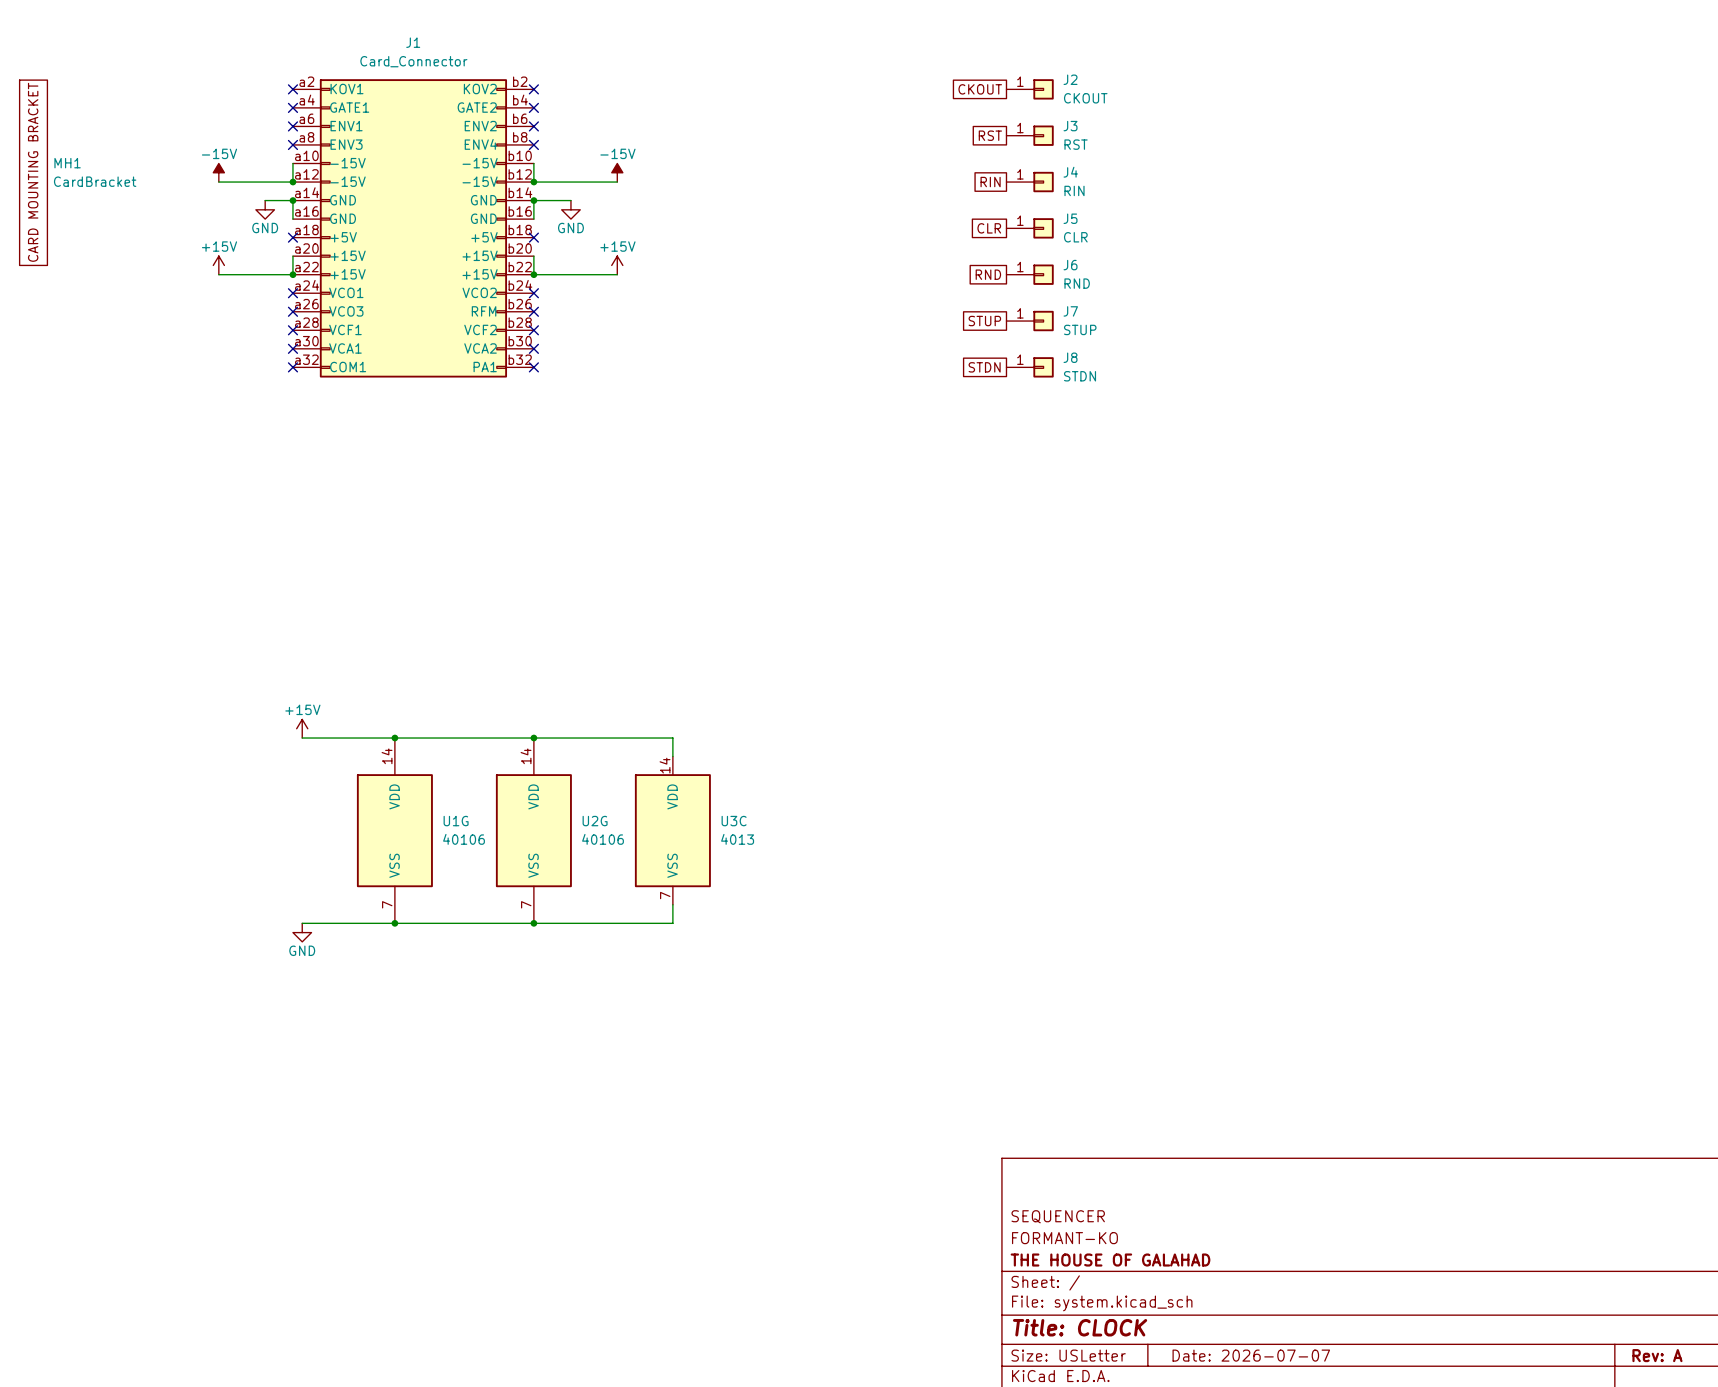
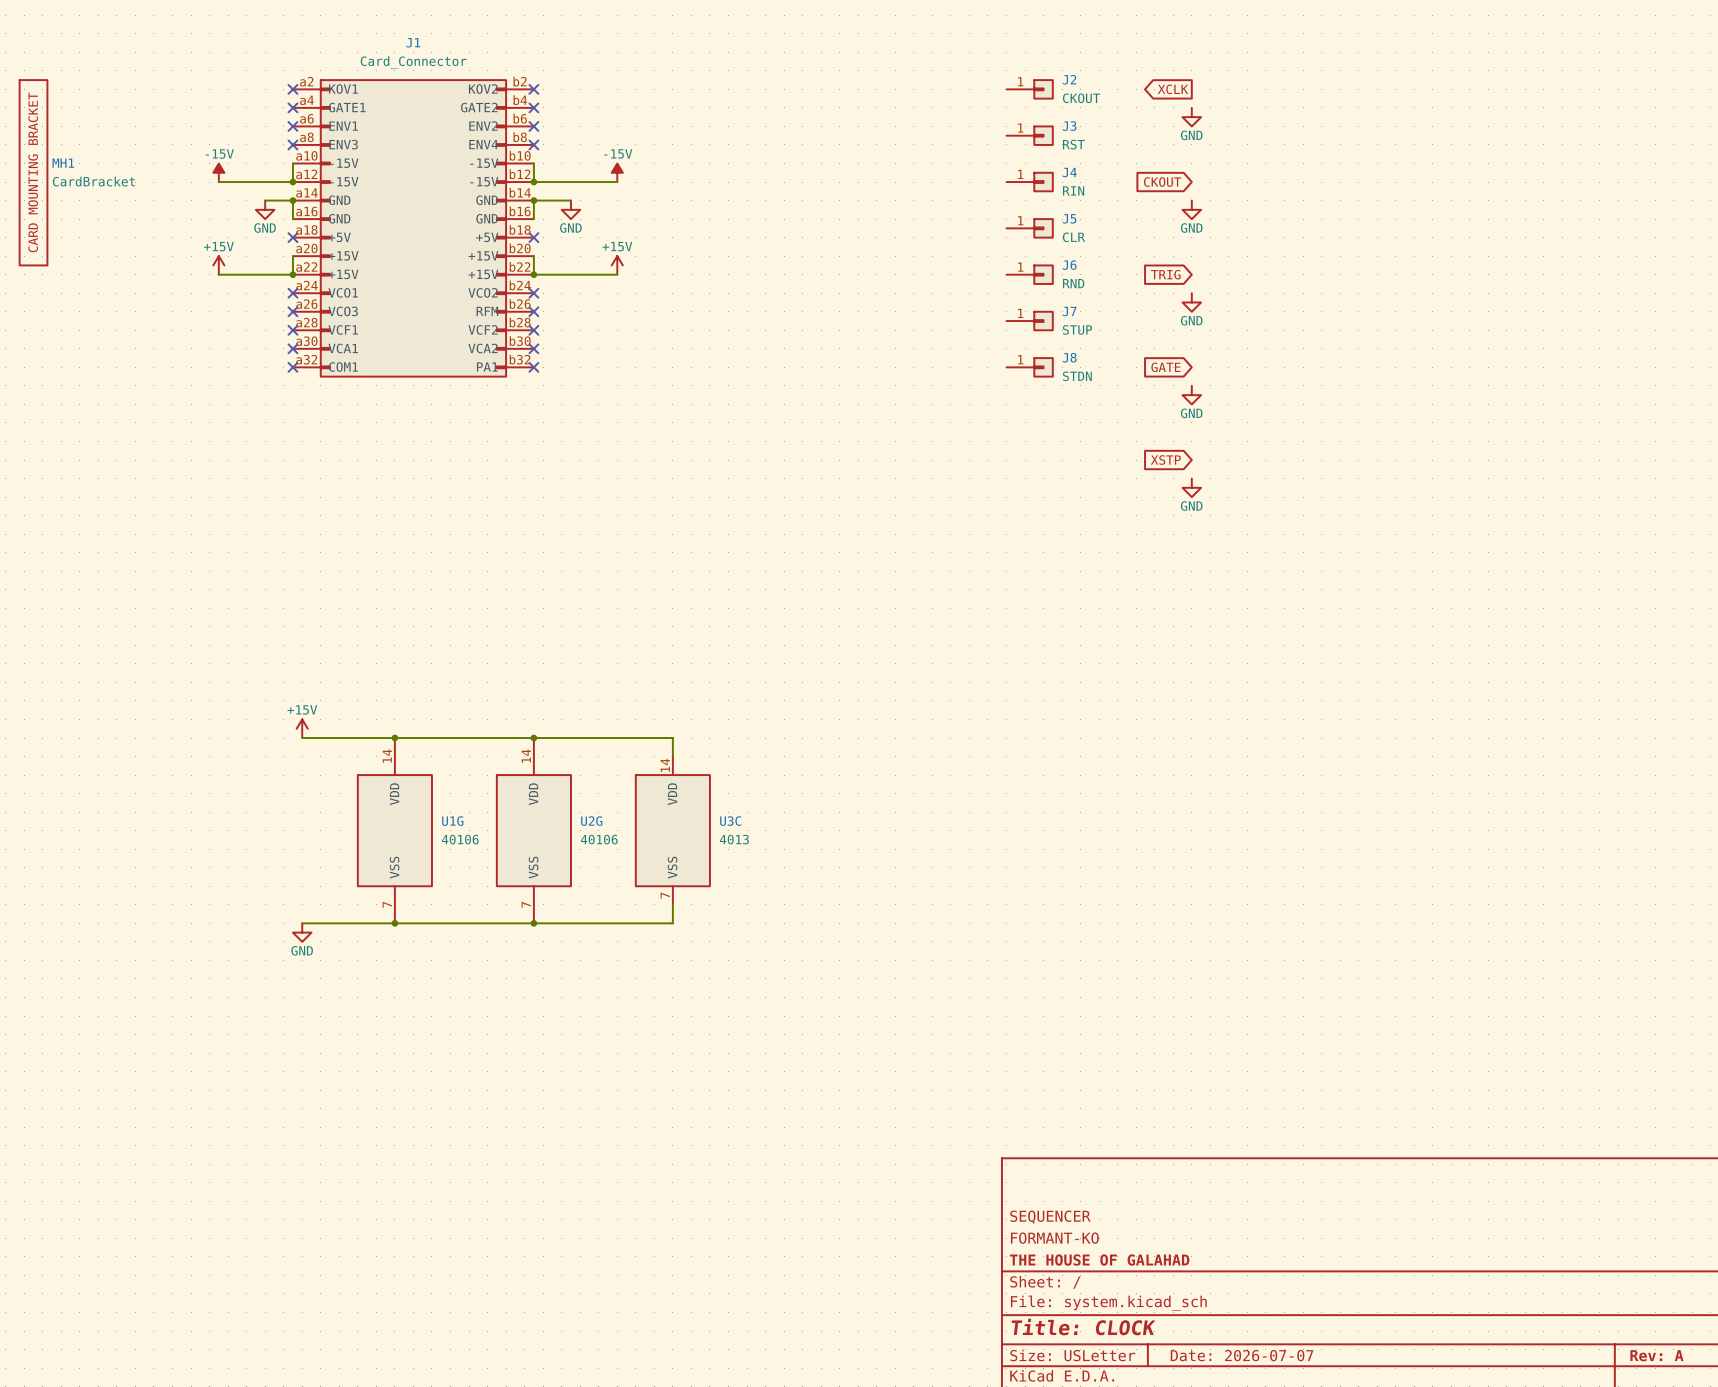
global label: CKOUT (980, 89) -> none
global label: none -> XCLK (1173, 89)
power symbol: none -> GND (1191, 117)
global label: RST (990, 135) -> none
global label: RIN (990, 182) -> none
global label: none -> CKOUT (1162, 182)
power symbol: none -> GND (1191, 209)
global label: CLR (989, 228) -> none
global label: RND (988, 274) -> none
global label: none -> TRIG (1165, 274)
power symbol: none -> GND (1191, 302)
global label: STUP (984, 321) -> none
global label: STDN (984, 367) -> none
global label: none -> GATE (1165, 367)
power symbol: none -> GND (1191, 395)
global label: none -> XSTP (1165, 460)
power symbol: none -> GND (1191, 487)

